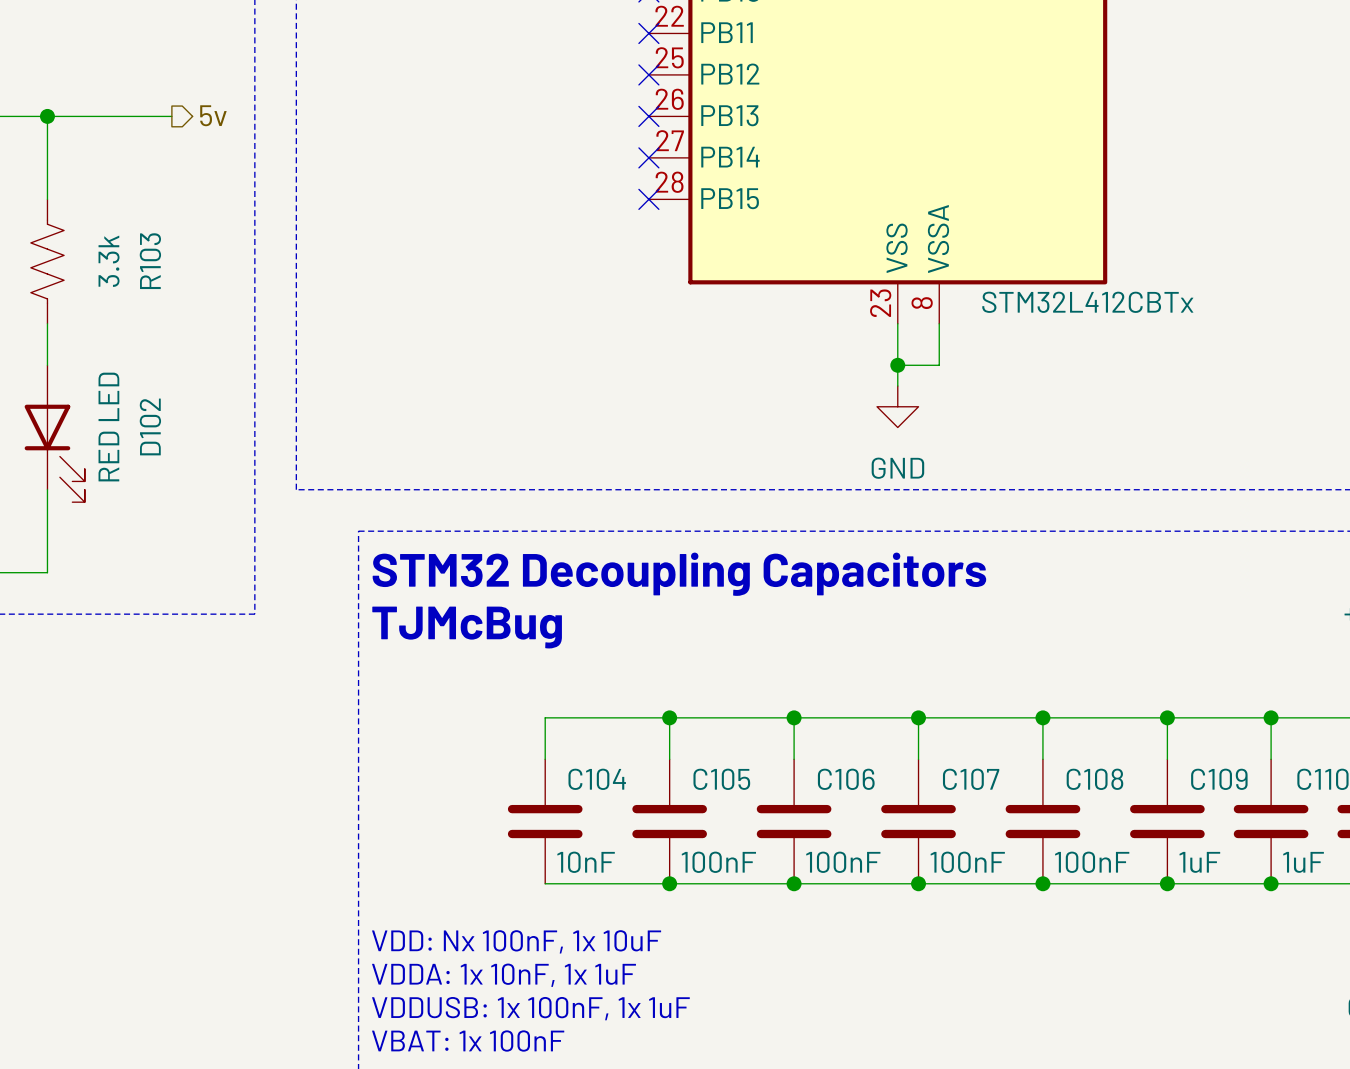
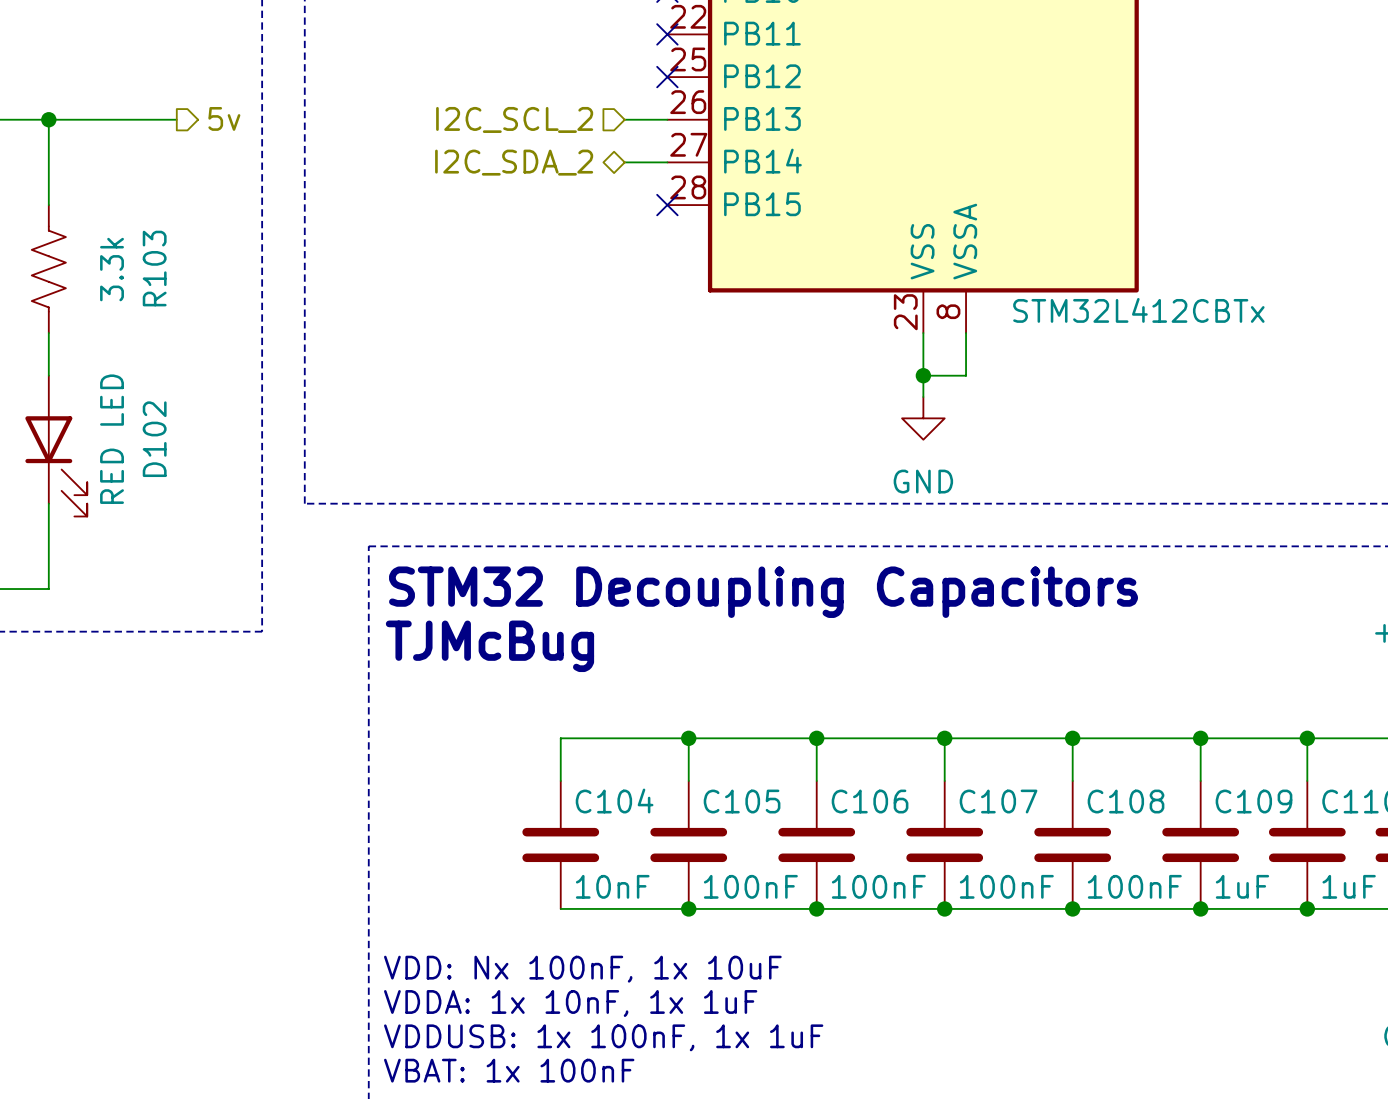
hierarchical label: none -> I2C_SCL_2 (514, 119)
wire: none -> (624, 119) (667, 119)
no-connect mark: (648, 116) -> none
hierarchical label: none -> I2C_SDA_2 (514, 162)
wire: none -> (624, 162) (667, 162)
no-connect mark: (648, 157) -> none

